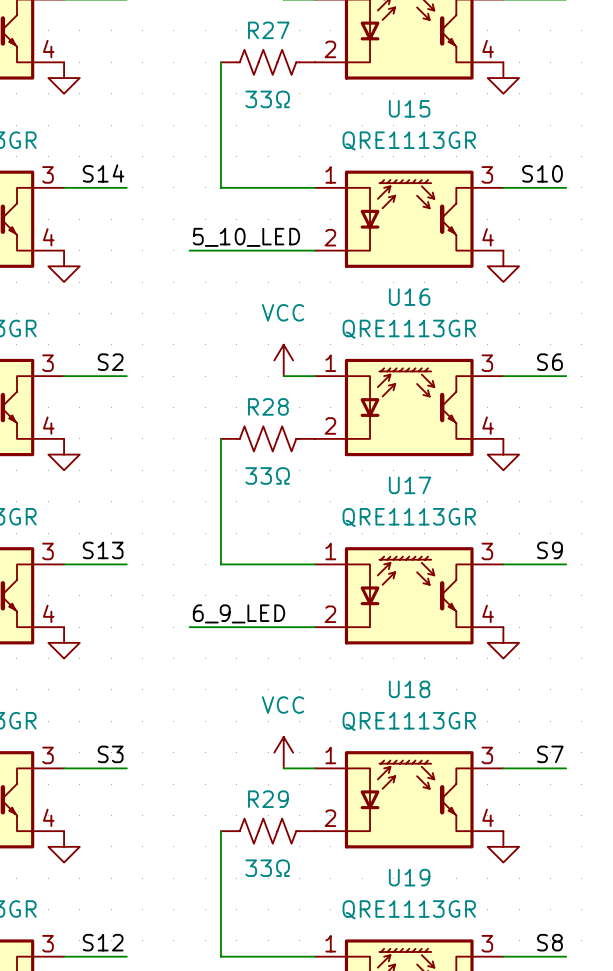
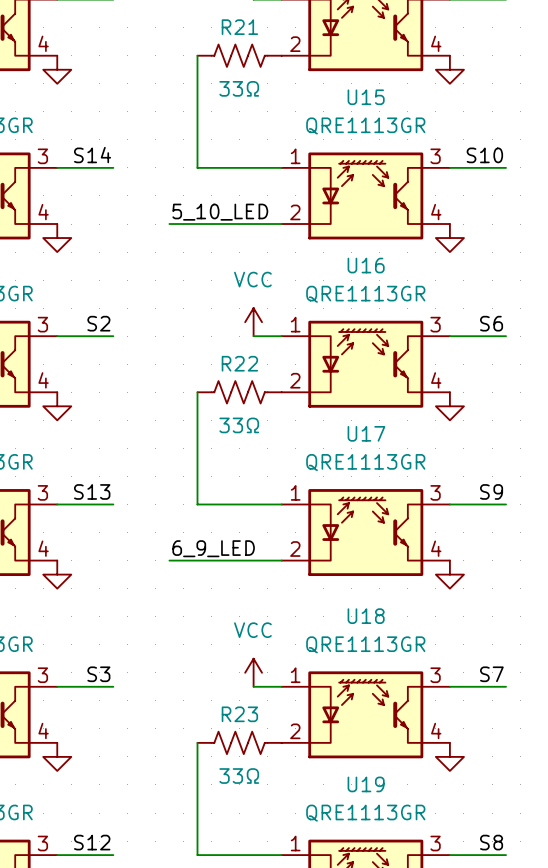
R27 name: R27 (268, 30) -> R21 (239, 27)
R28 name: R28 (268, 406) -> R22 (239, 363)
R29 name: R29 (268, 799) -> R23 (239, 714)

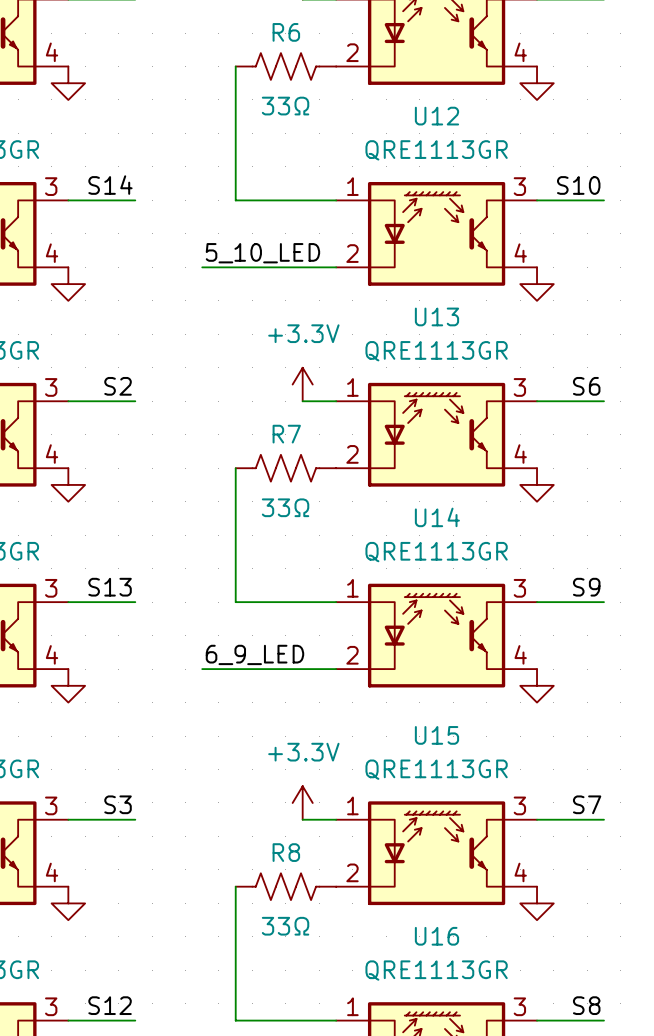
R21 name: R21 (239, 27) -> R6 (286, 32)
U15 name: U15 (366, 97) -> U12 (436, 116)
U16 name: U16 (366, 265) -> U13 (436, 316)
power symbol: VCC (253, 322) -> +3.3V (302, 384)
R22 name: R22 (239, 363) -> R7 (286, 434)
U17 name: U17 (366, 433) -> U14 (437, 517)
U18 name: U18 (366, 616) -> U15 (436, 735)
power symbol: VCC (253, 672) -> +3.3V (302, 802)
R23 name: R23 (239, 714) -> R8 (286, 852)
U19 name: U19 (366, 784) -> U16 (436, 936)

